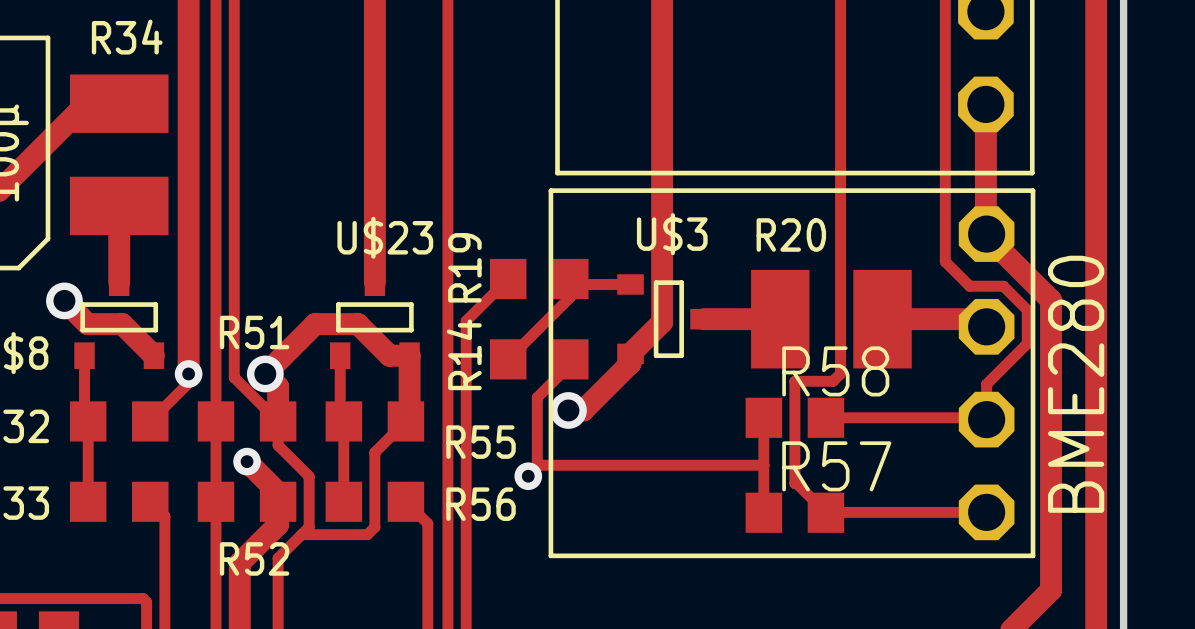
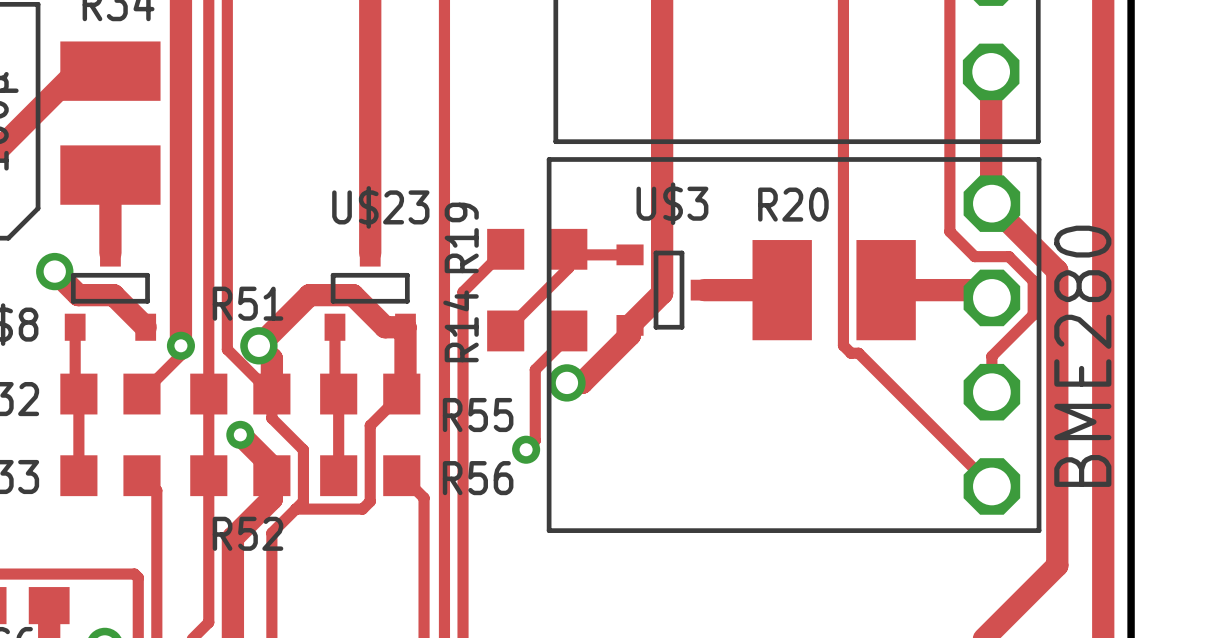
track: (840, 373) (833, 381) (794, 381) (794, 483) (825, 512) -> none
track: (763, 417) (763, 512) -> none
R58: (794, 417) -> none
track: (825, 417) (984, 417) (986, 419) -> none
track: (763, 465) (539, 465) (537, 467) -> none
R57: (794, 512) -> none
track: (826, 512) (986, 512) -> (843, 345) (851, 353) (858, 353) (991, 486)

